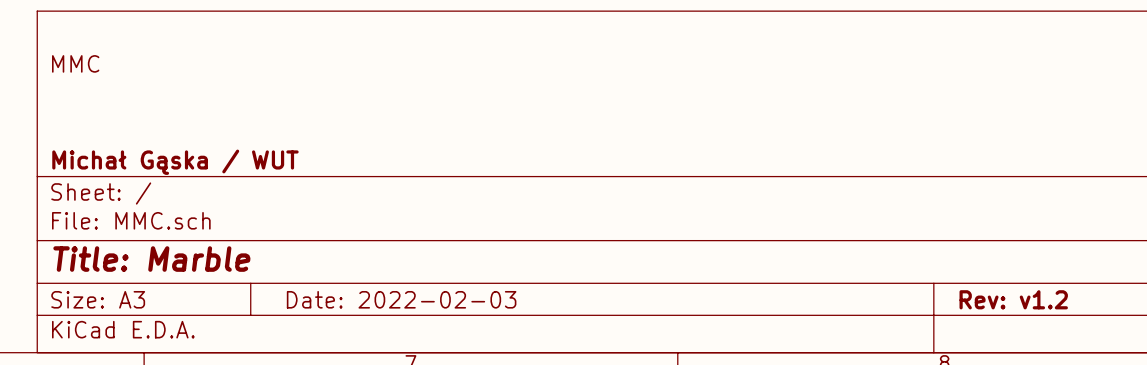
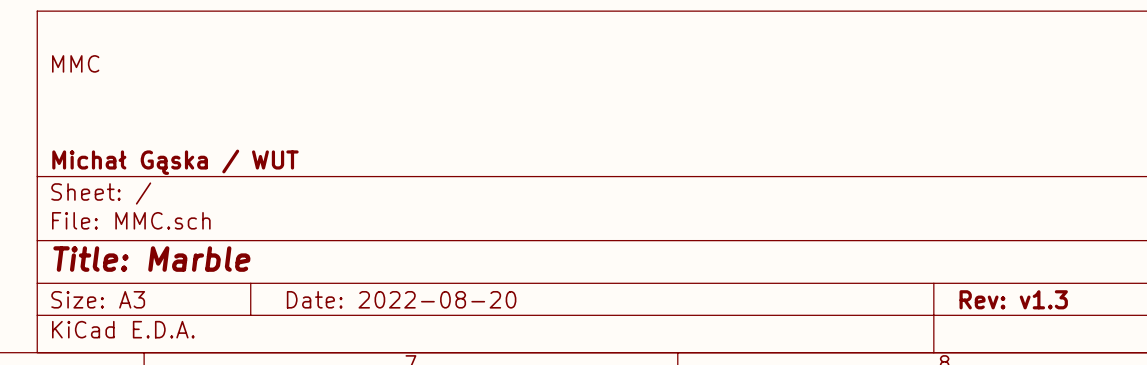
title block: Date: 2022-02-03 (401, 299) -> Date: 2022-08-20 (401, 299)
title block: Rev: v1.2 (1013, 299) -> Rev: v1.3 (1013, 299)

